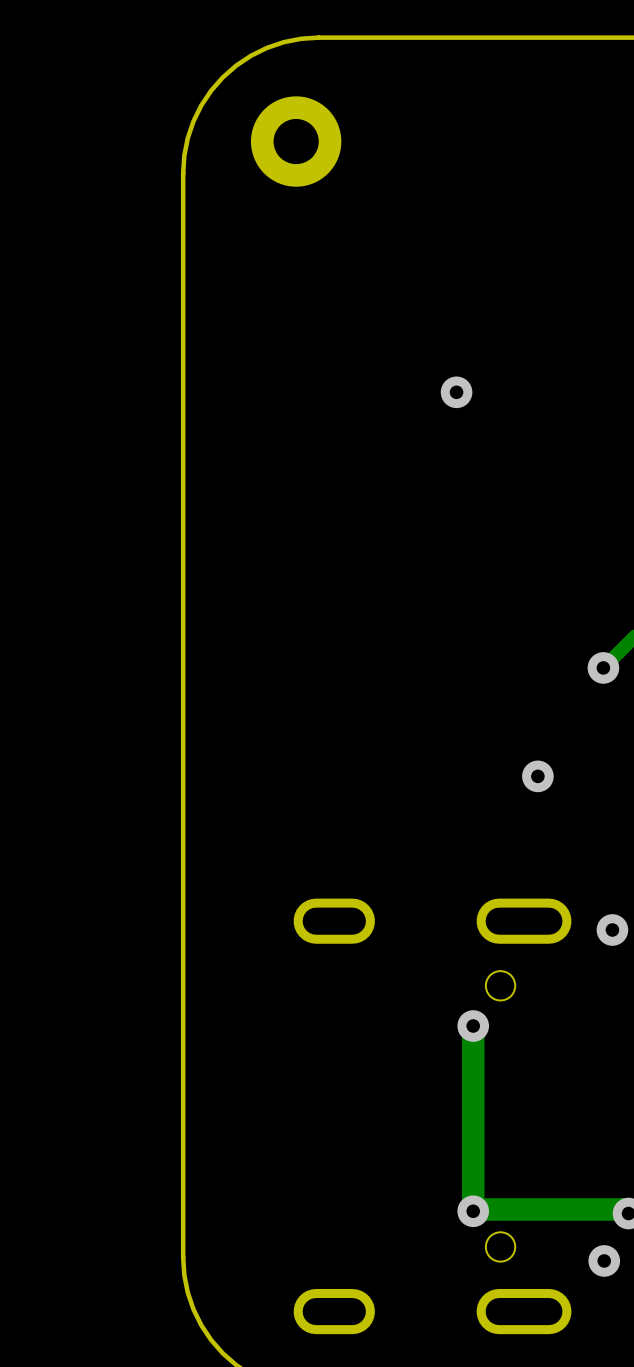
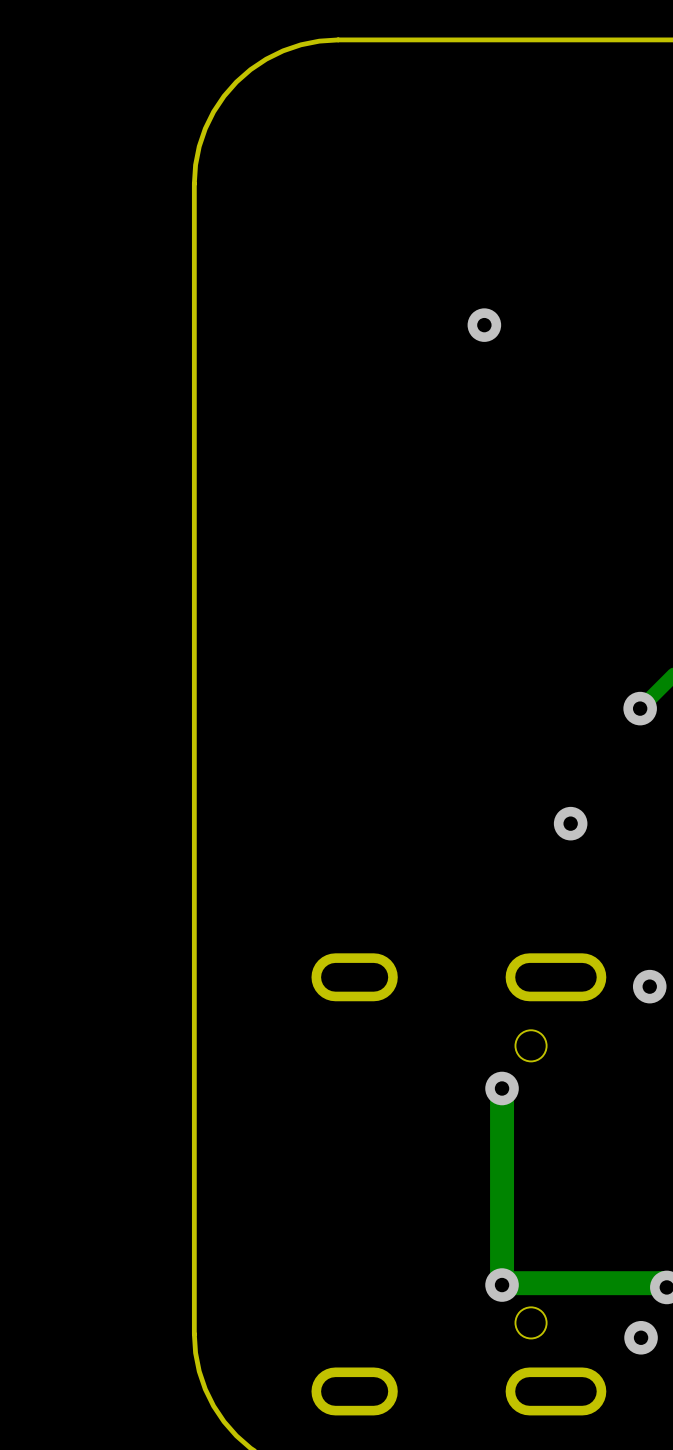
part: (296, 141) -> none
via position: (456, 392) -> (484, 325)

